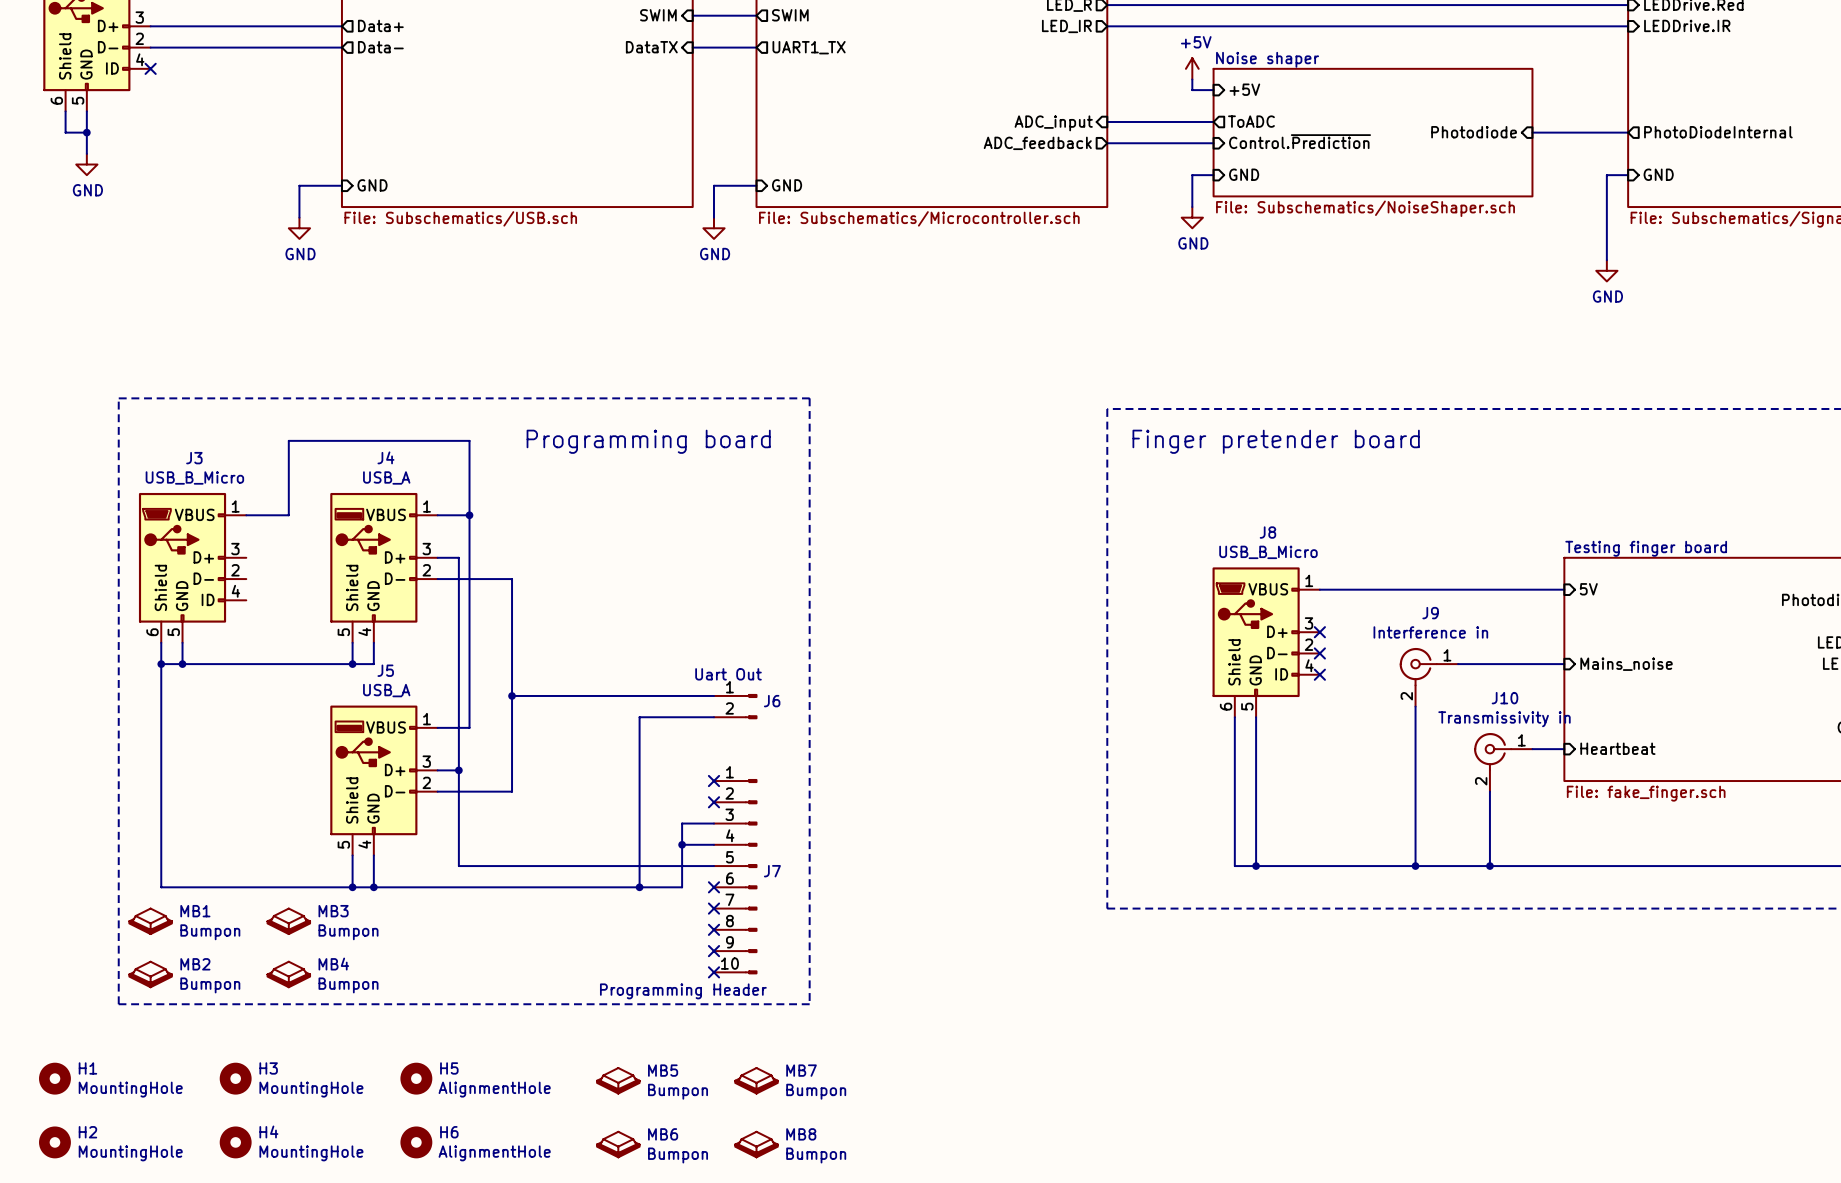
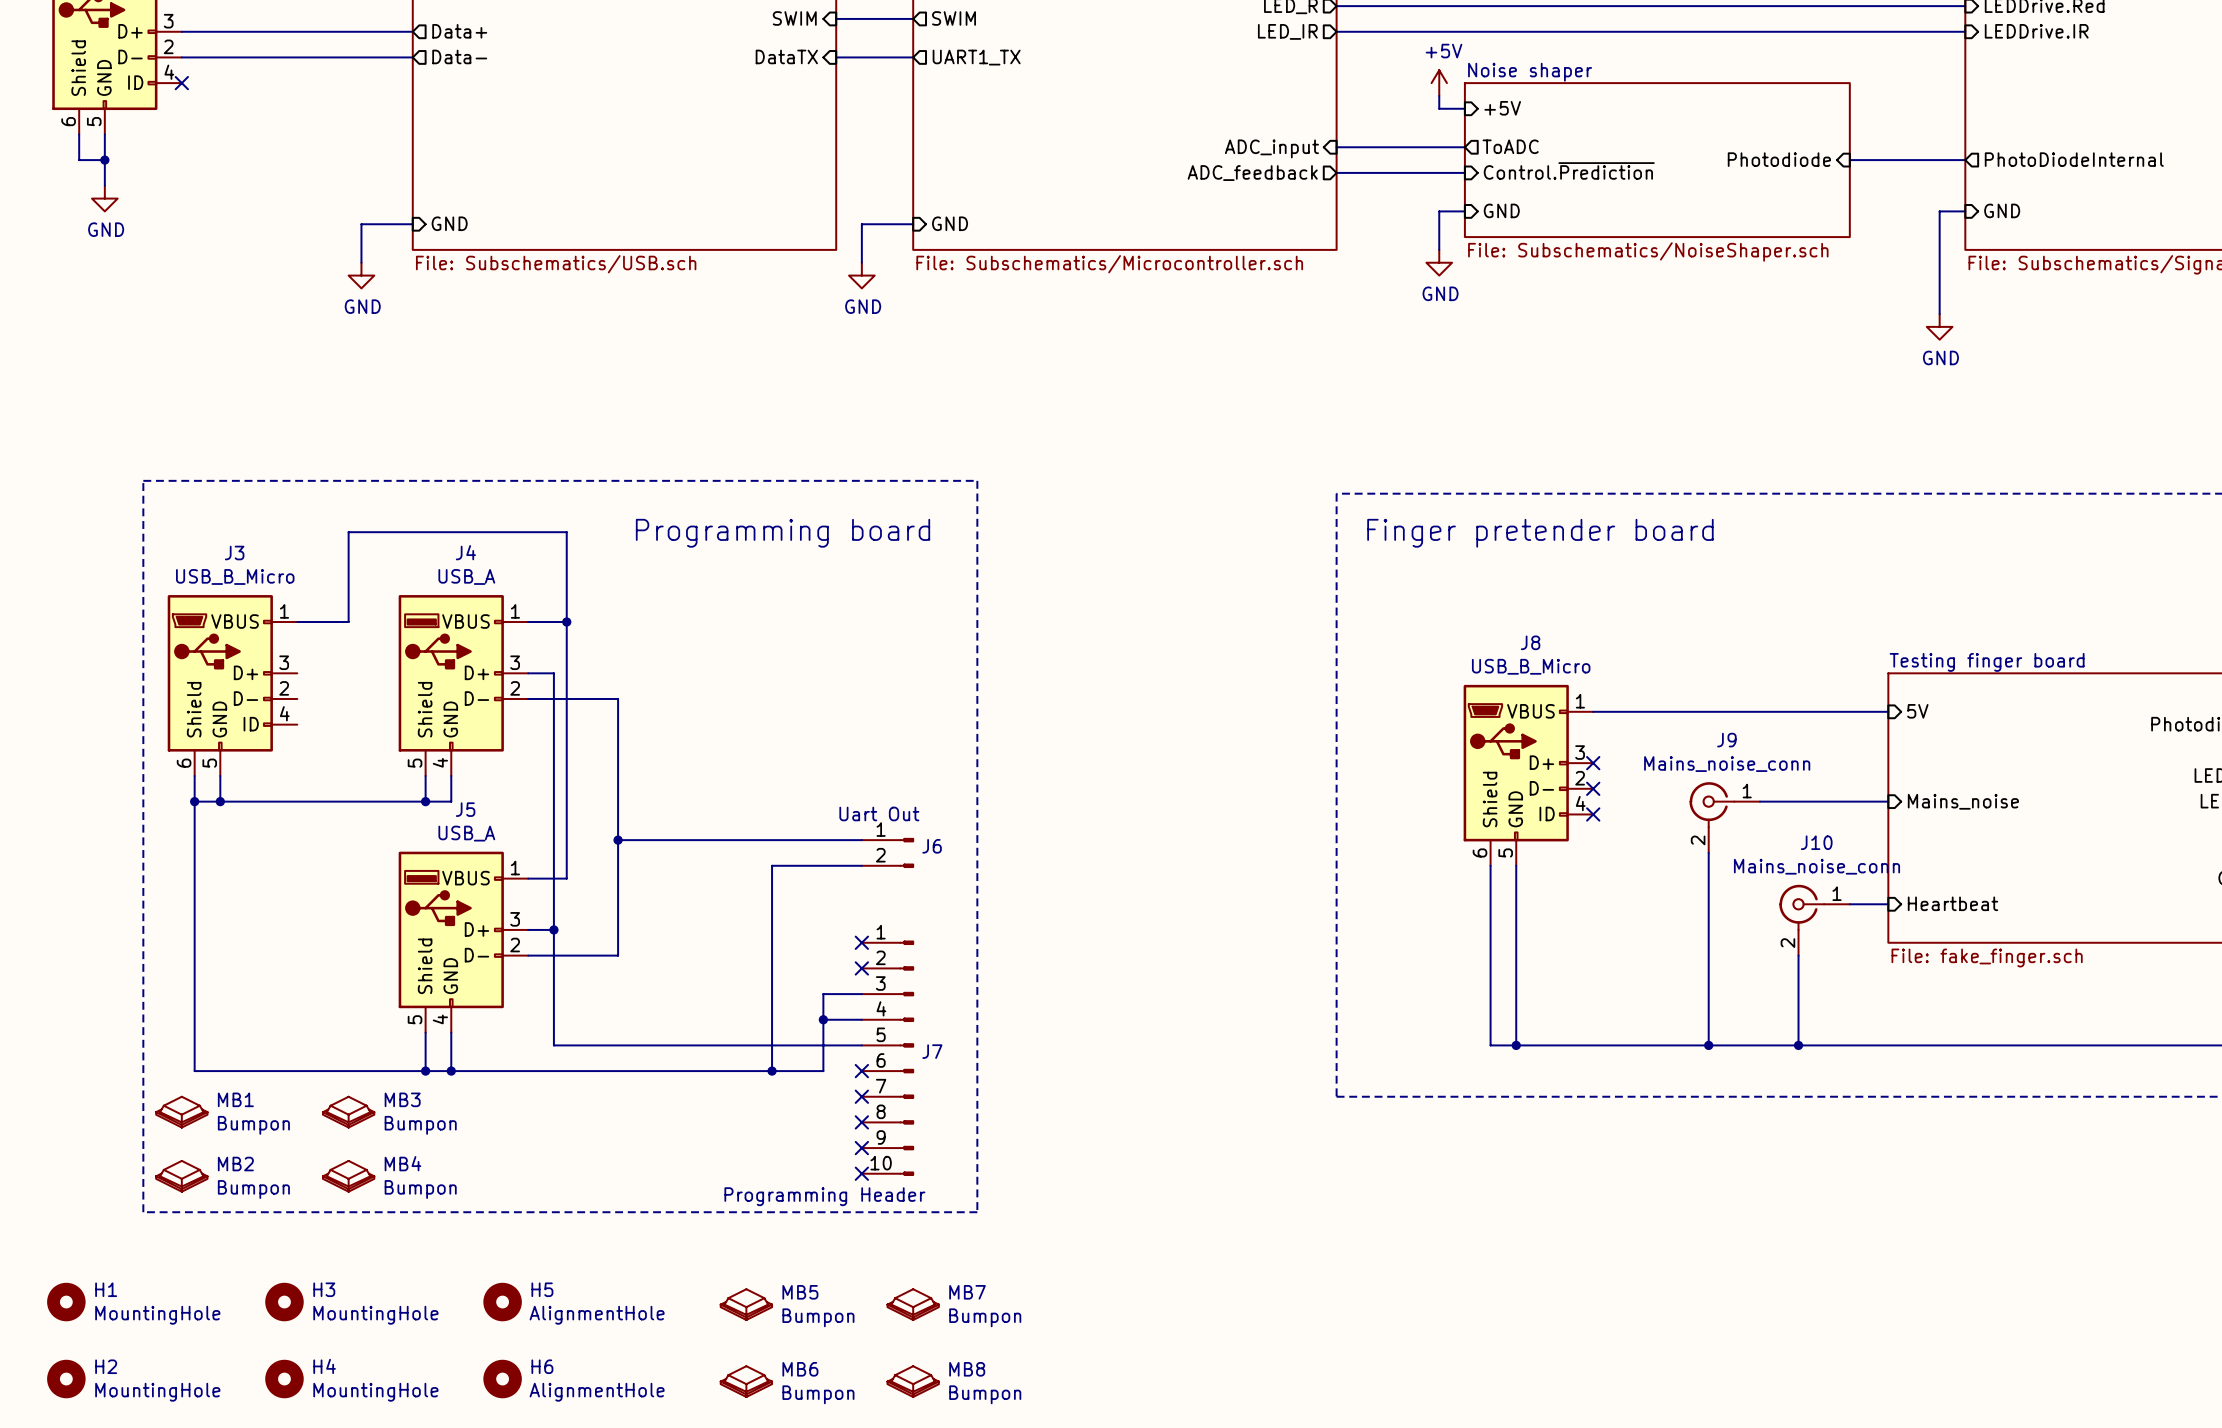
J9 value: Interference in (1430, 632) -> Mains_noise_conn (1727, 764)
J10 value: Transmissivity in (1504, 719) -> Mains_noise_conn (1816, 866)

